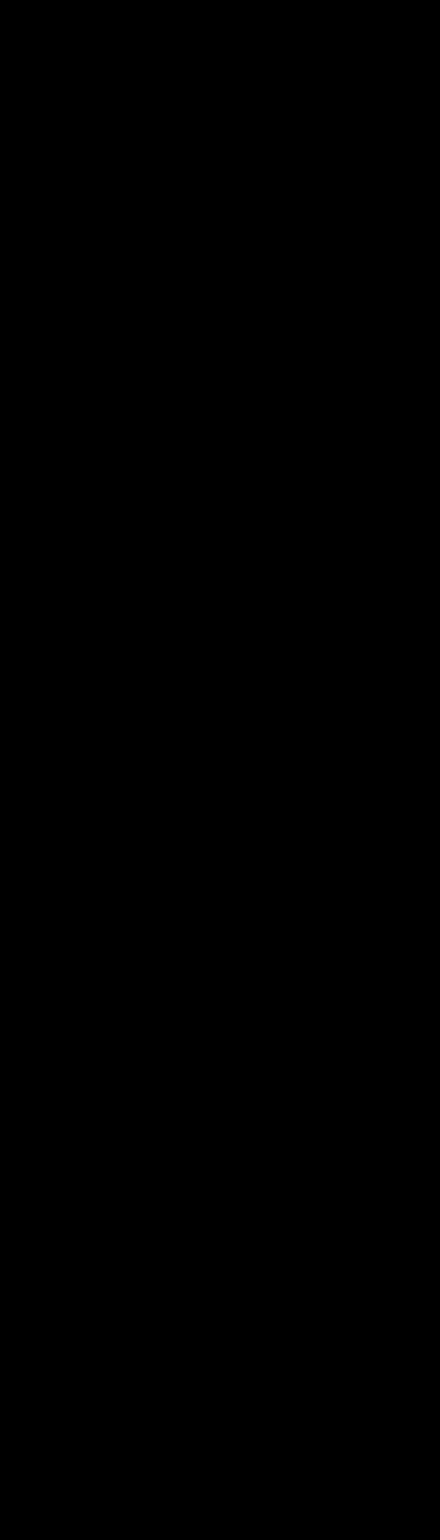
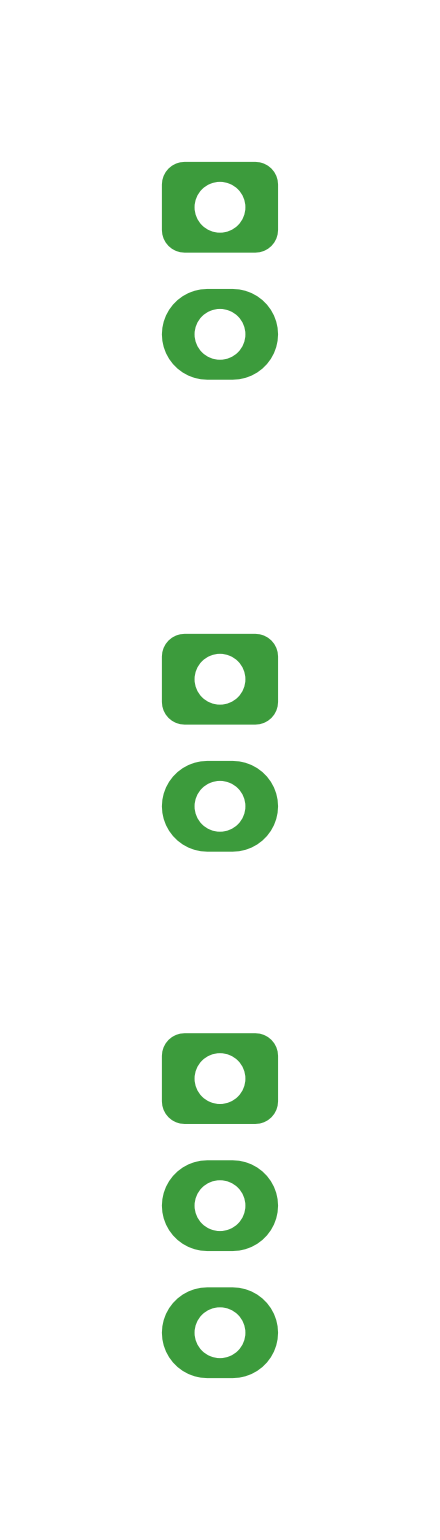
part: none -> (219, 270)
part: none -> (219, 742)
part: none -> (219, 1205)

